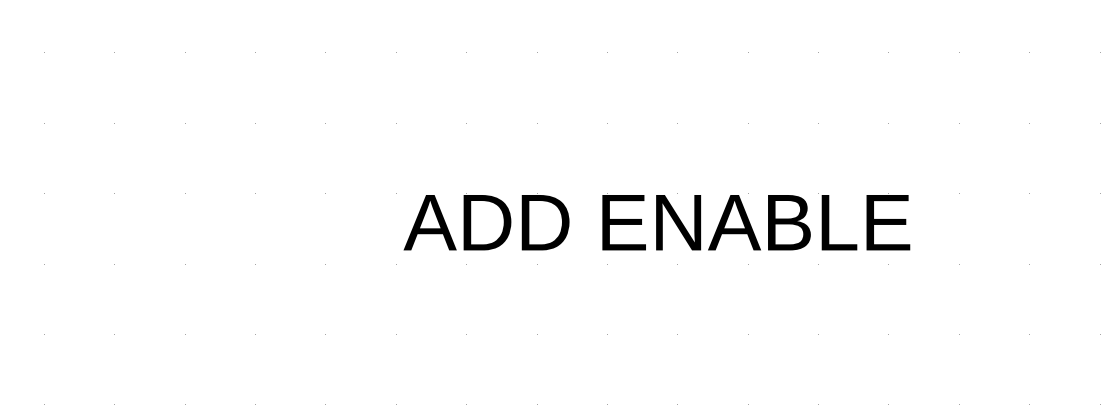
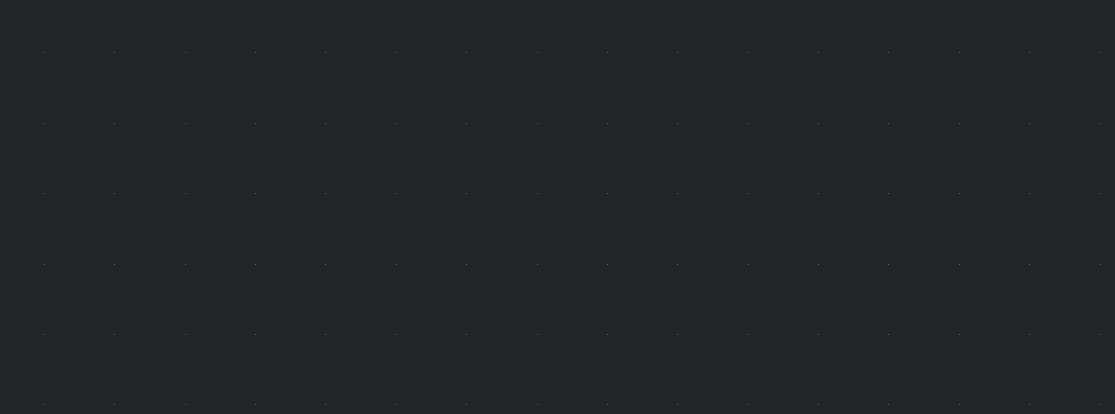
text: ADD ENABLE (656, 222) -> none

